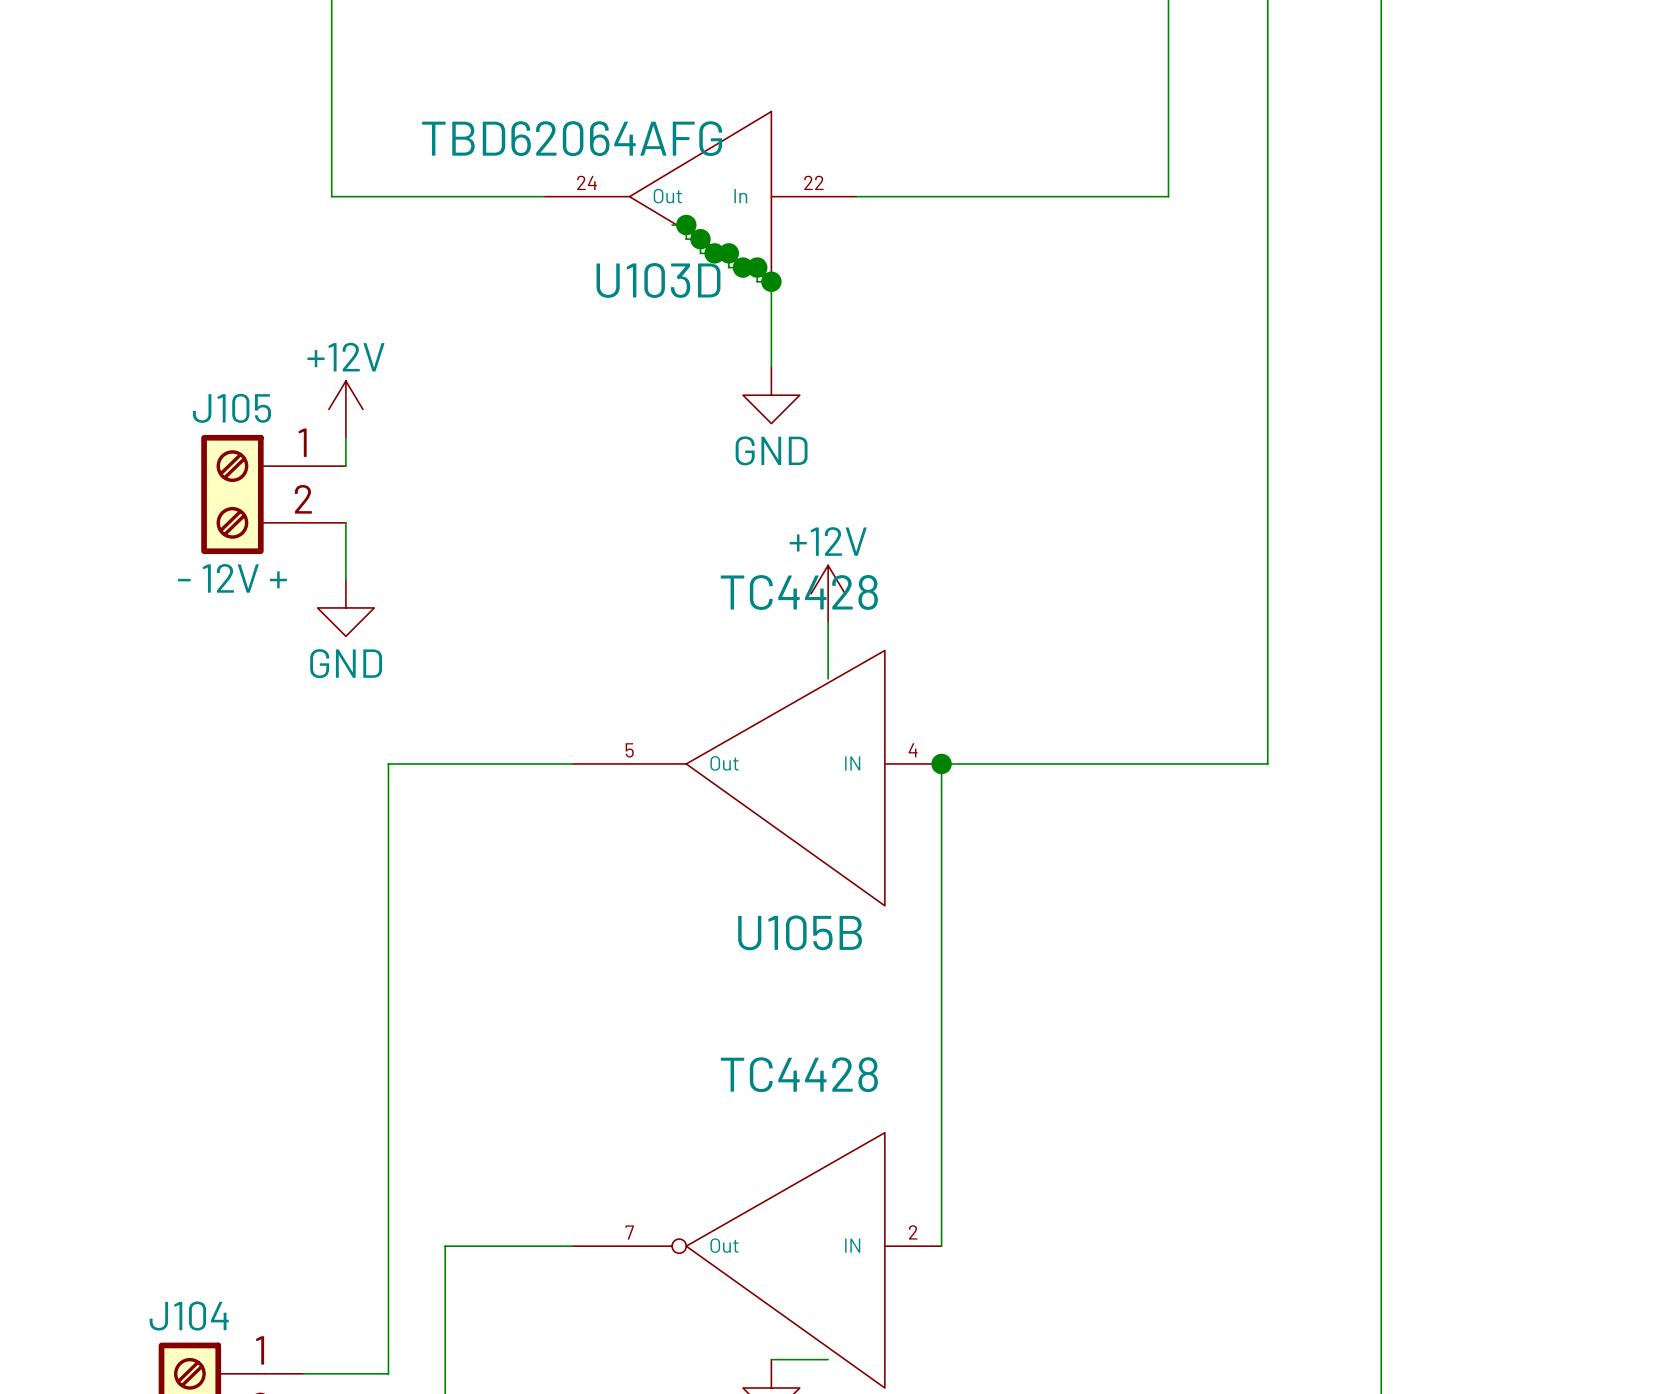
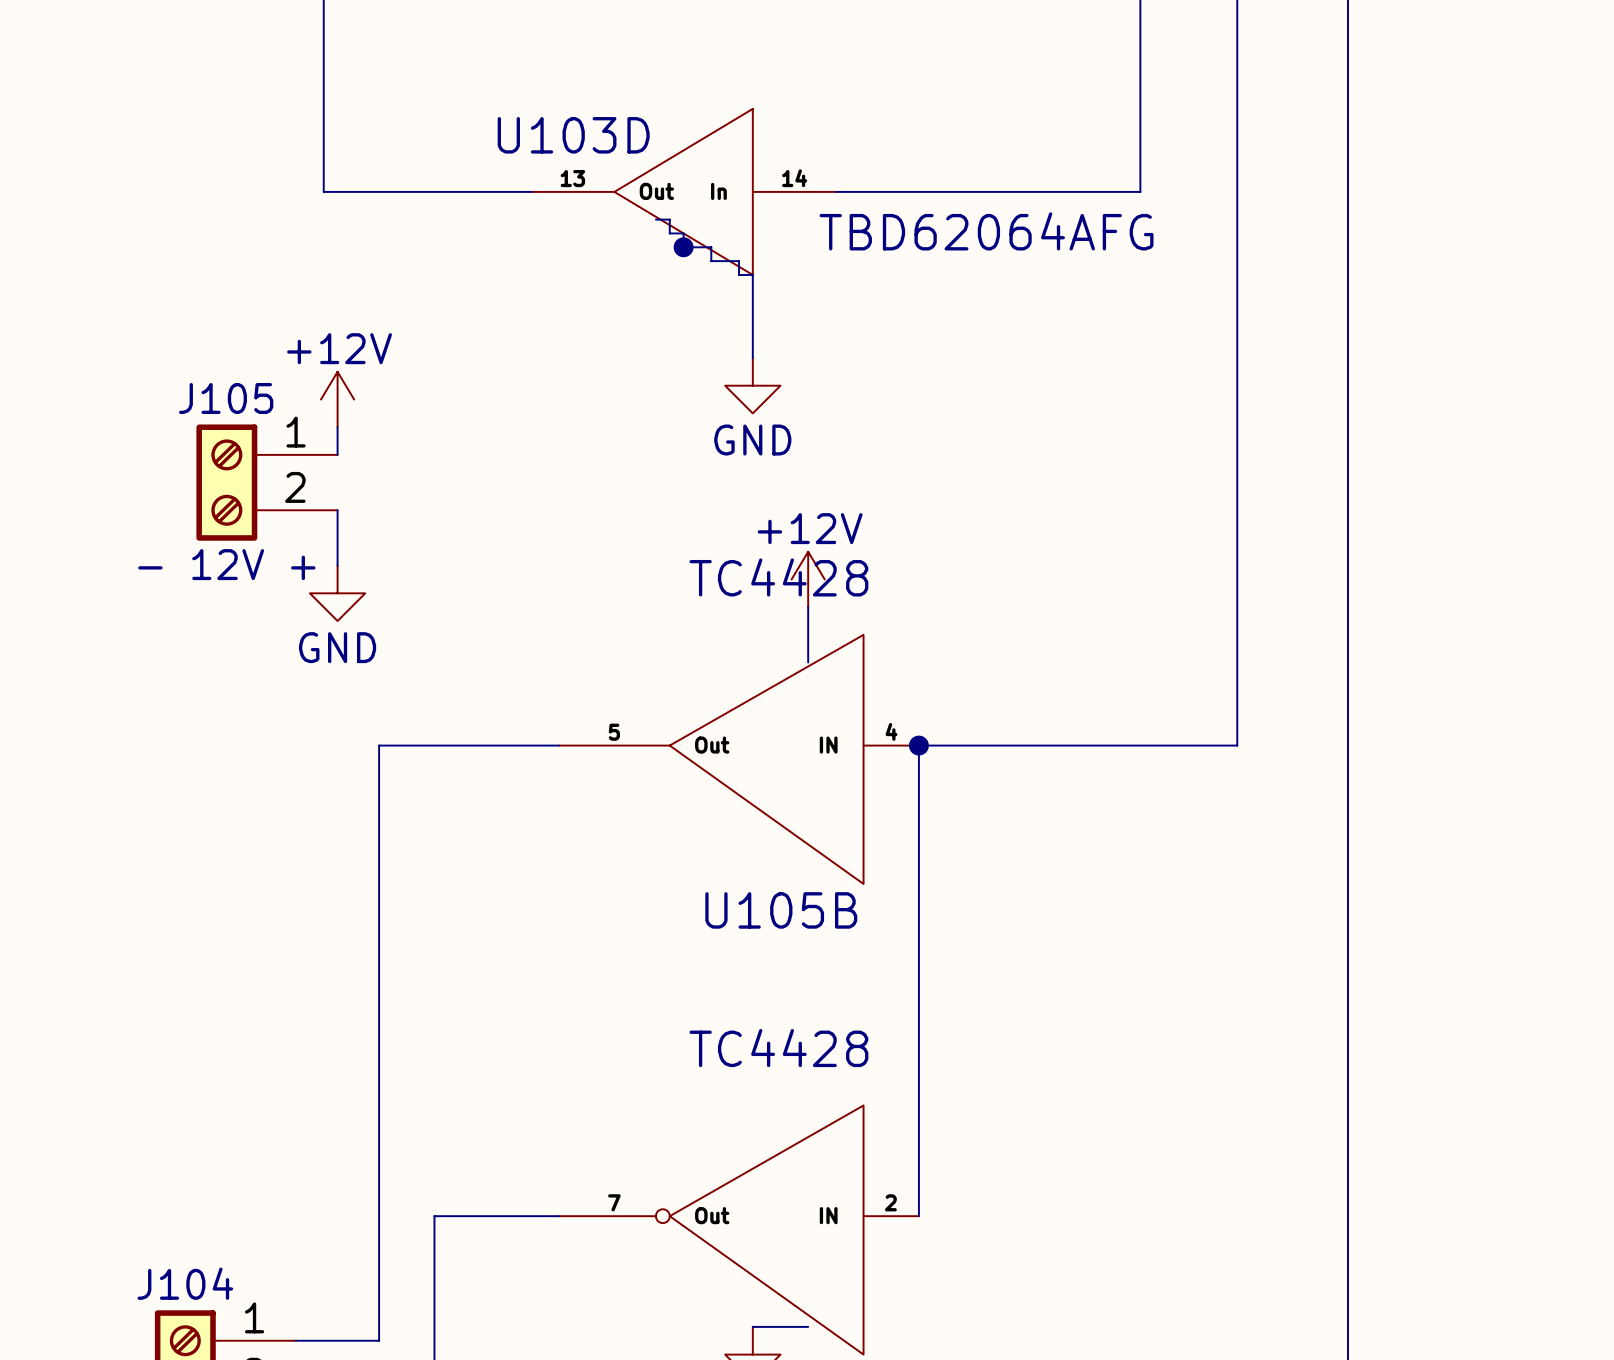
U103D value position: TBD62064AFG (572, 138) -> TBD62064AFG (986, 231)
U103D pin number: 24 (586, 182) -> 13 (572, 178)
U103D pin number: 22 (813, 182) -> 14 (794, 178)
junction: (686, 225) -> none
junction: (700, 239) -> none
junction: none -> (683, 247)
junction: (714, 253) -> none
junction: (728, 253) -> none
junction: (743, 267) -> none
junction: (757, 267) -> none
U103D name position: U103D (658, 280) -> U103D (573, 135)
junction: (771, 281) -> none

